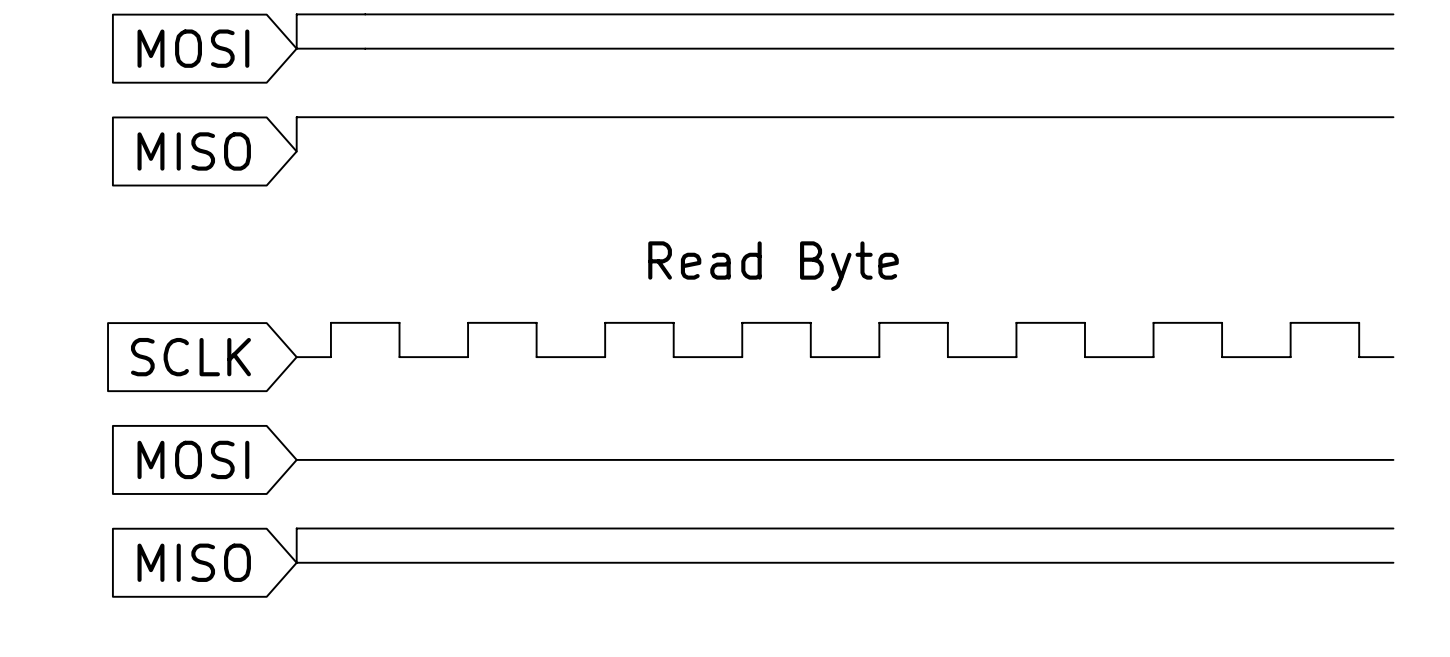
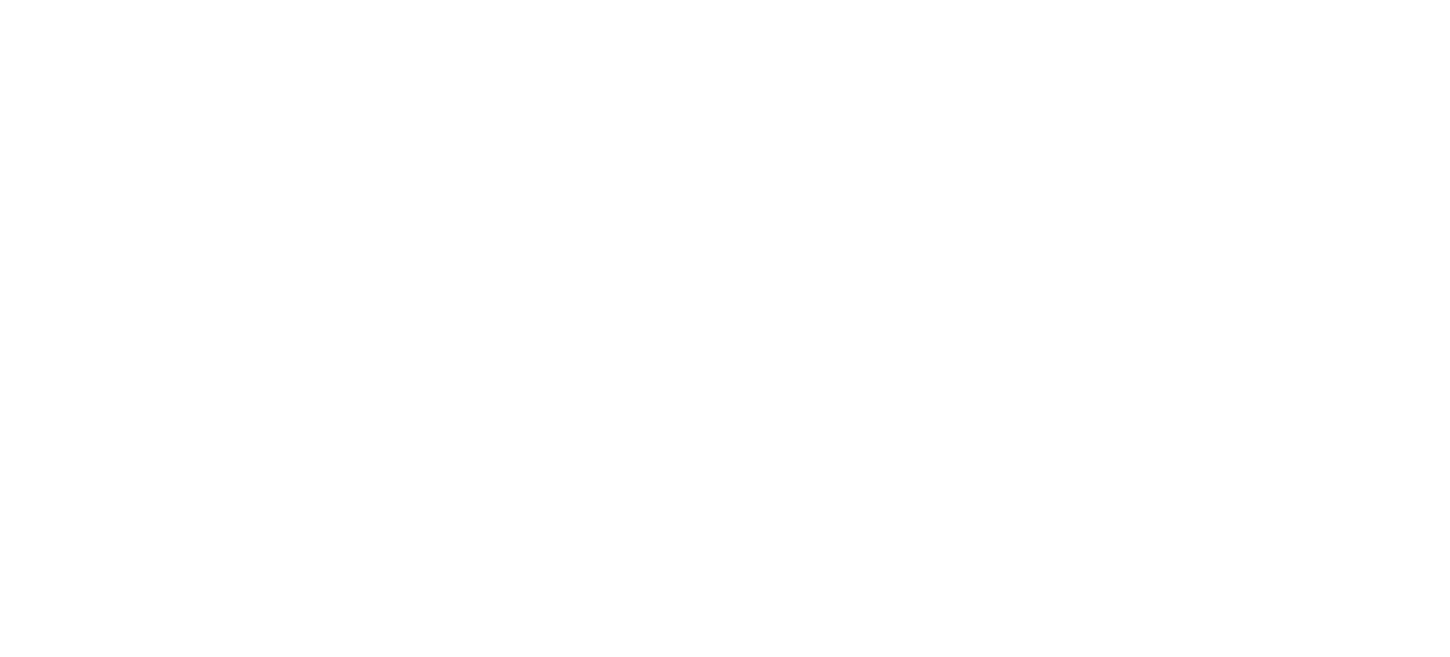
line: (1393, 14) (296, 14) (296, 48) (1393, 48) -> none
global label: MOSI (193, 48) -> none
wire: (1393, 117) (296, 117) (296, 151) -> none
global label: MISO (194, 151) -> none
text: Read Byte (773, 266) -> none
global label: SCLK (190, 357) -> none
wire: (296, 357) (330, 357) (330, 322) (399, 322) (399, 357) (468, 357) (468, 322) (536, 322) (536, 357) (605, 357) (605, 322) (673, 322) (673, 357) (742, 357) (742, 322) (810, 322) (810, 357) (879, 357) (879, 322) (947, 322) (947, 357) (1016, 357) (1016, 322) (1084, 322) (1084, 357) (1153, 357) (1153, 322) (1222, 322) (1222, 357) (1290, 357) (1290, 322) (1359, 322) (1359, 357) (1393, 357) -> none
global label: MOSI (193, 459) -> none
wire: (296, 459) (1393, 459) -> none
line: (1393, 528) (296, 528) (296, 562) (1393, 562) -> none
global label: MISO (194, 562) -> none

